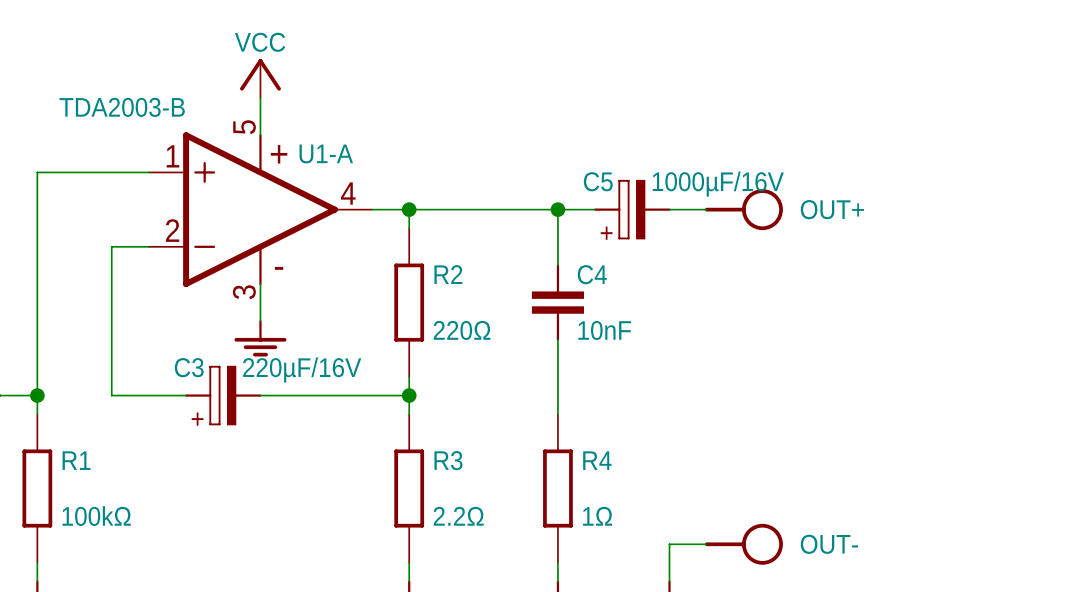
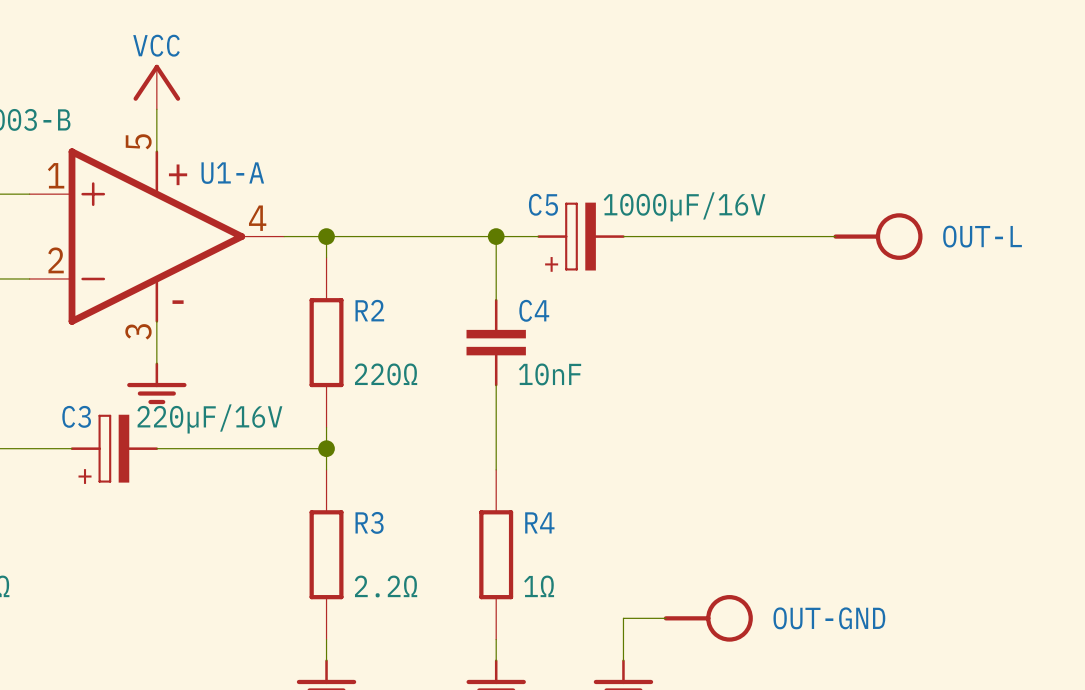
wire: none -> (665, 236) (835, 236)
OUT+: (743, 209) -> none
OUT-L: none -> (877, 236)
OUT- name: OUT- (829, 544) -> OUT-GND (829, 618)

